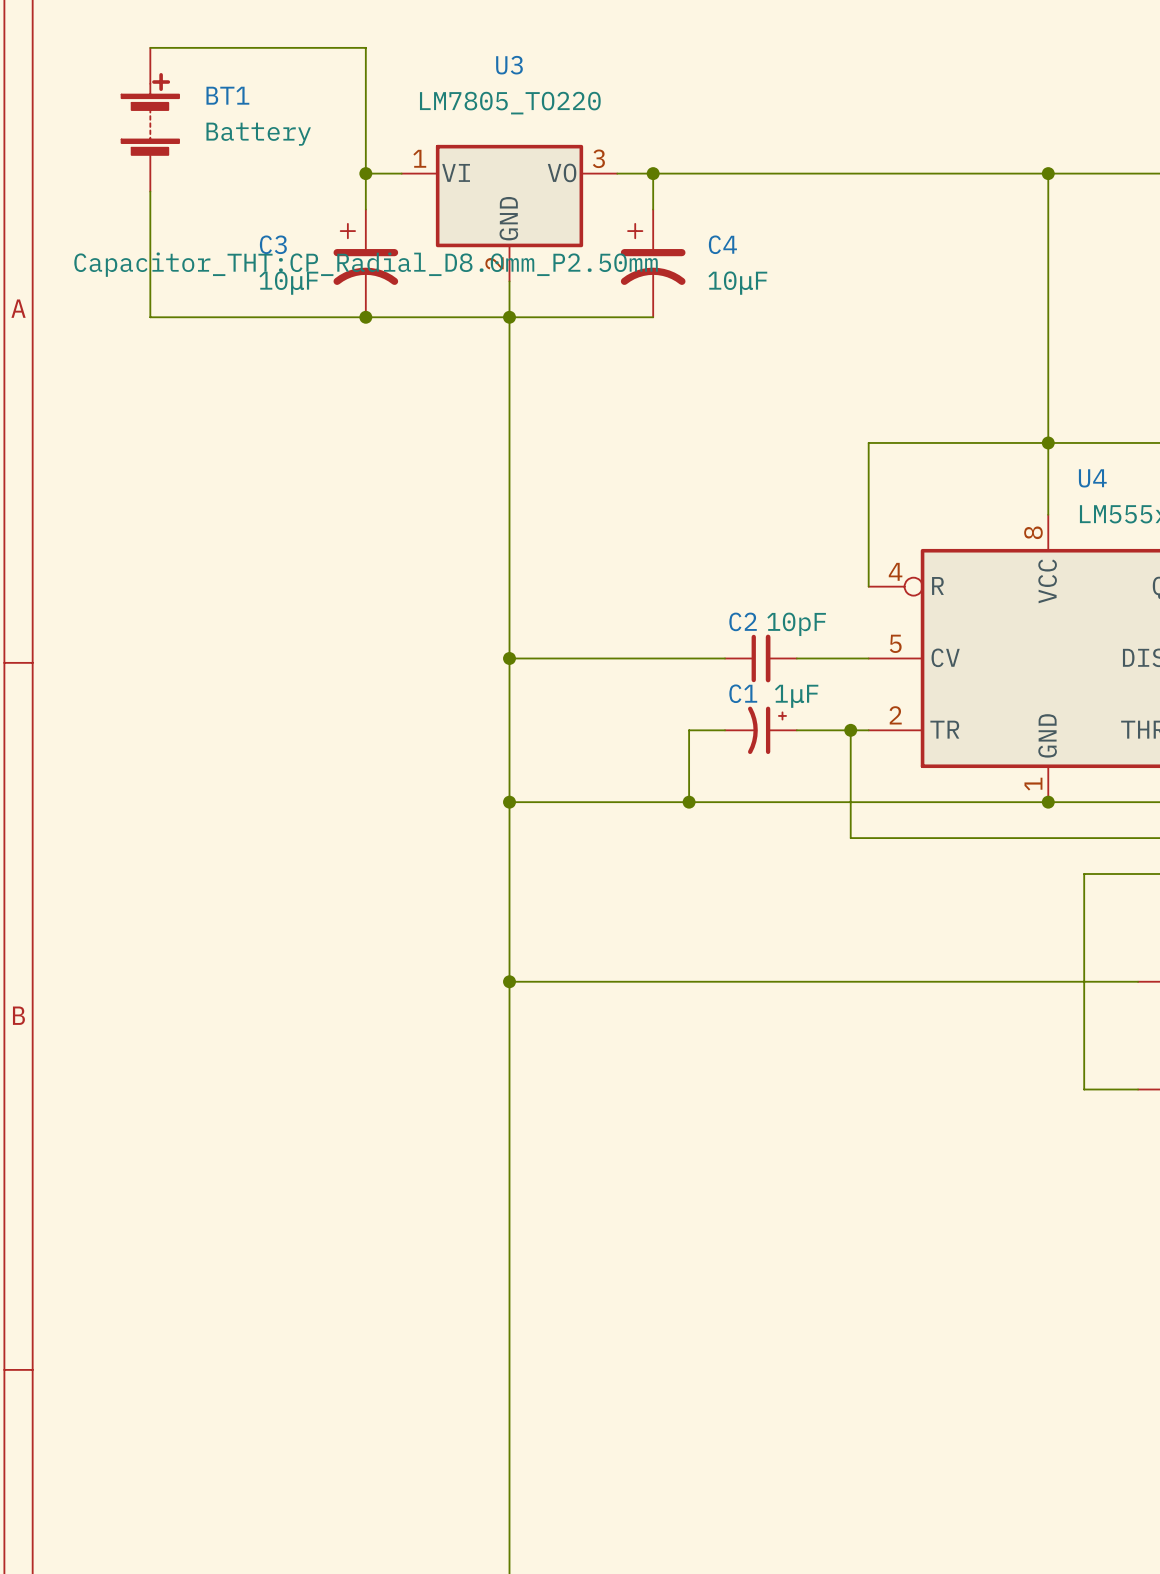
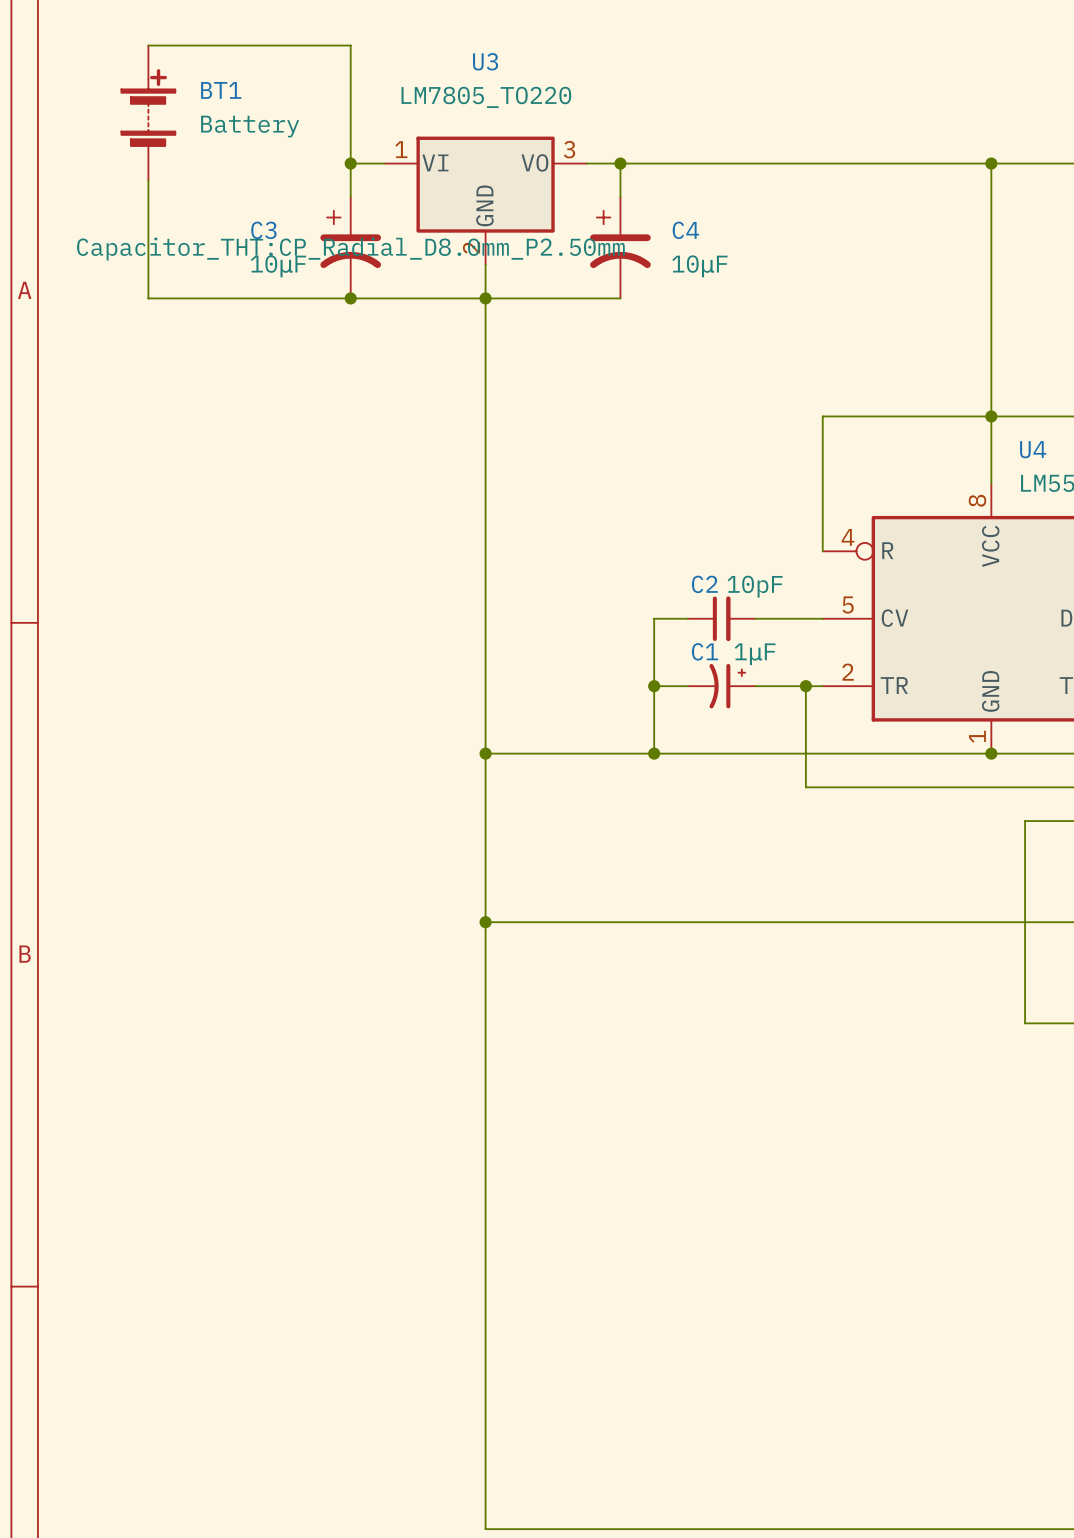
wire: (509, 658) (689, 658) -> (654, 686) (654, 618)
junction: (509, 658) -> none
junction: none -> (654, 686)

